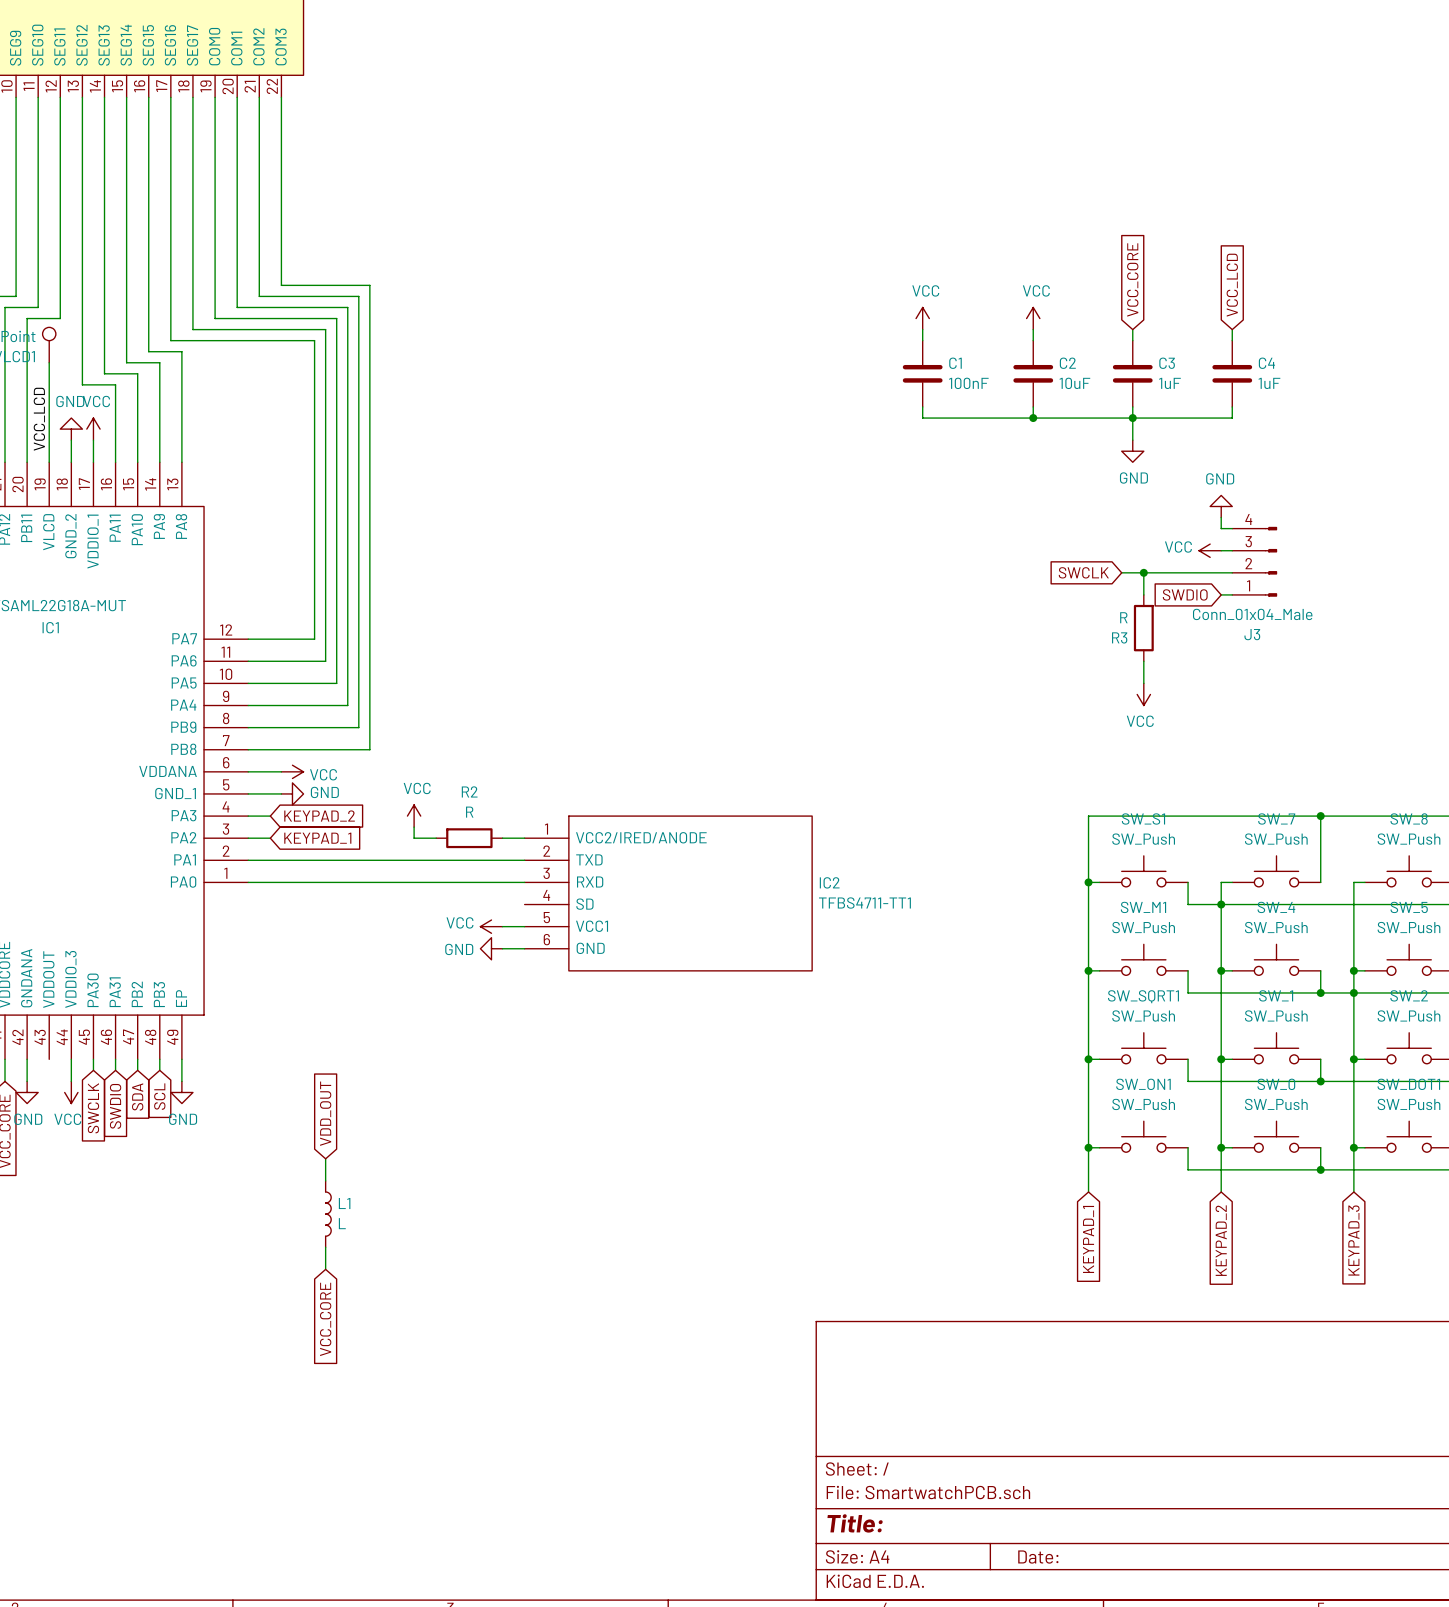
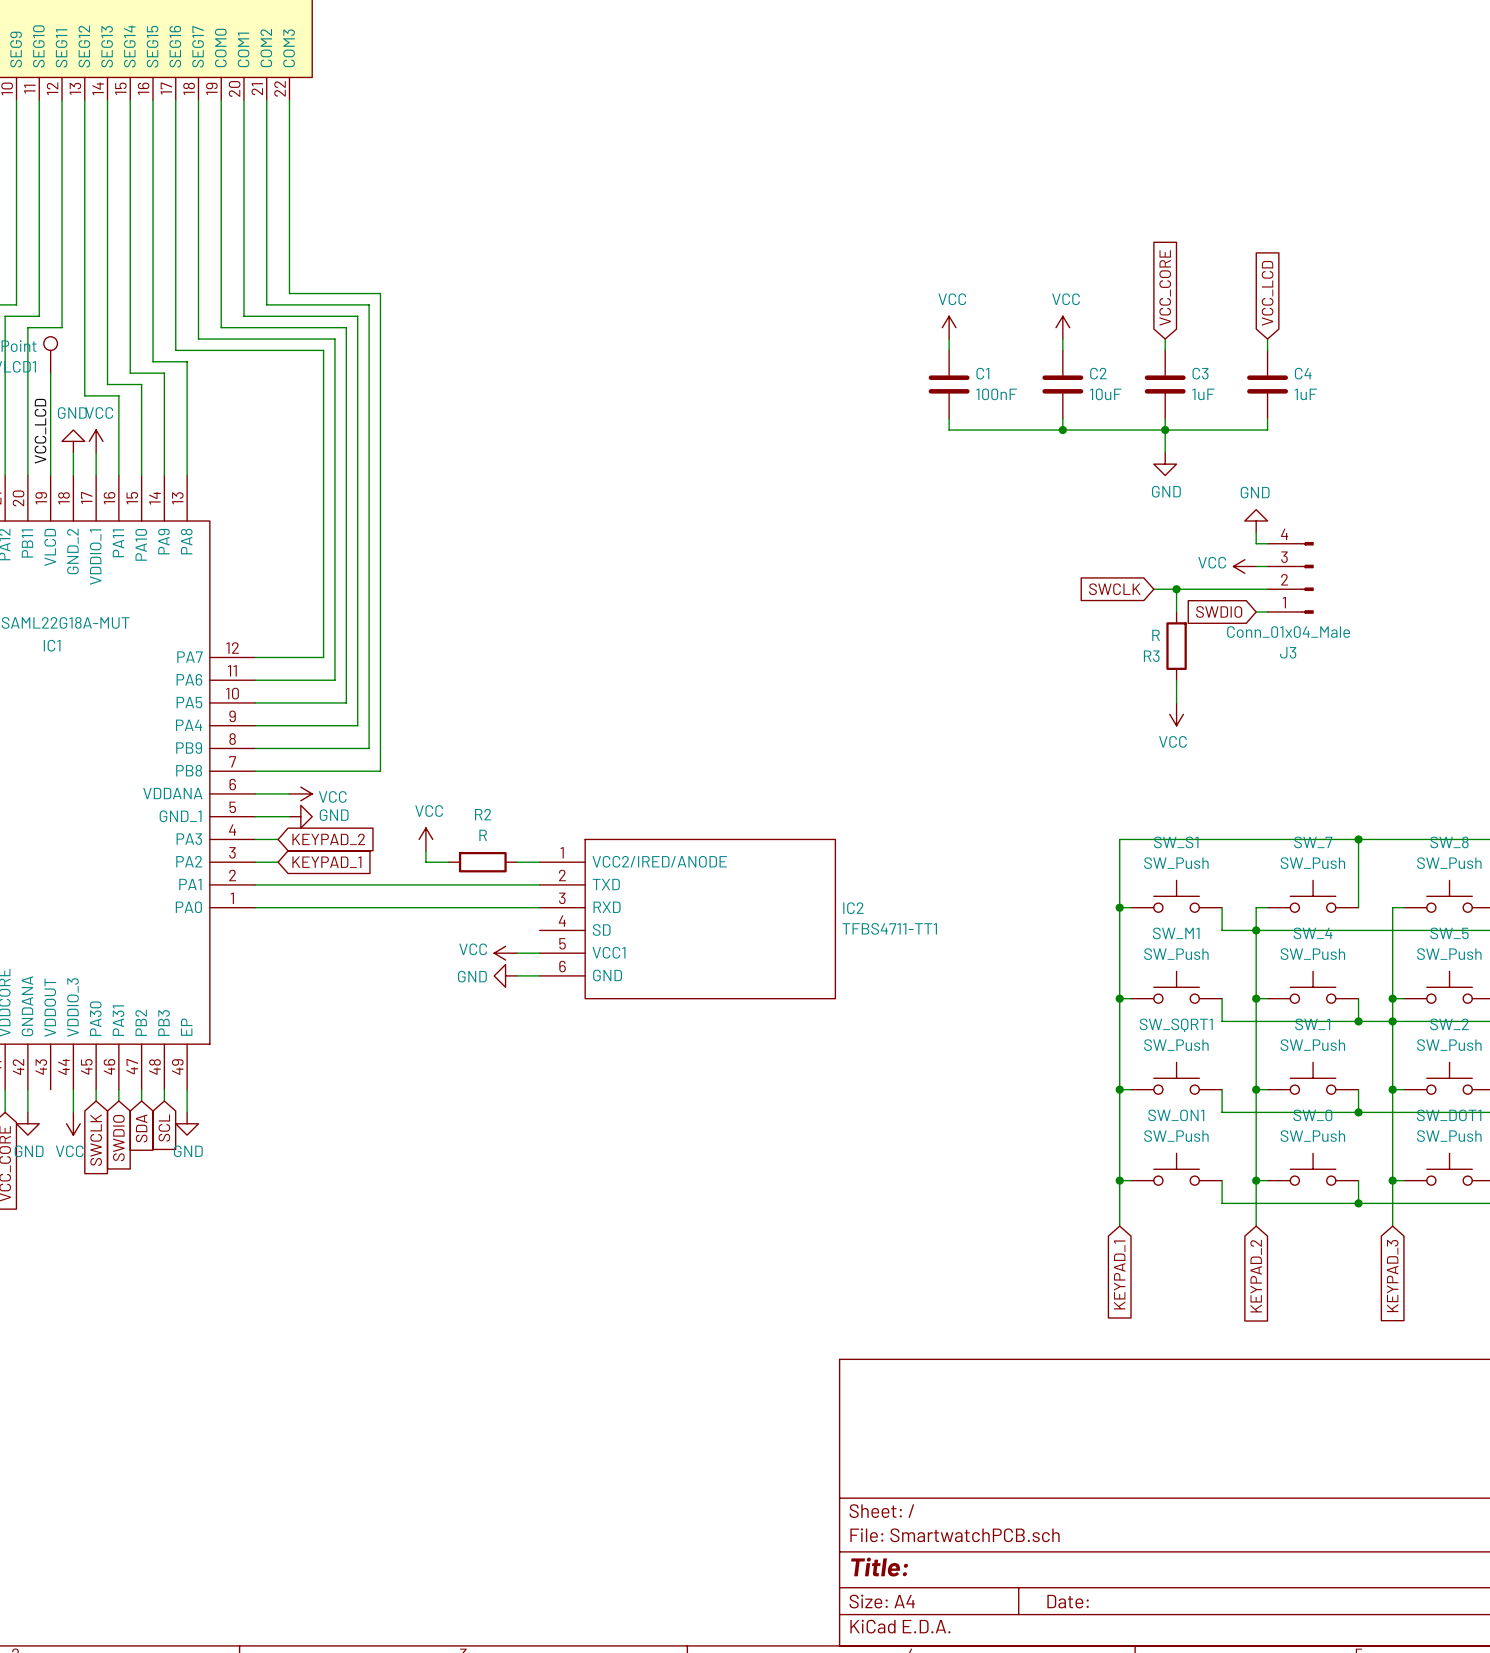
global label: VDD_OUT (325, 1113) -> none
wire: (325, 1158) (325, 1180) -> none
L1: L (328, 1214) -> none
wire: (325, 1247) (325, 1269) -> none
global label: VCC_CORE (325, 1319) -> none

